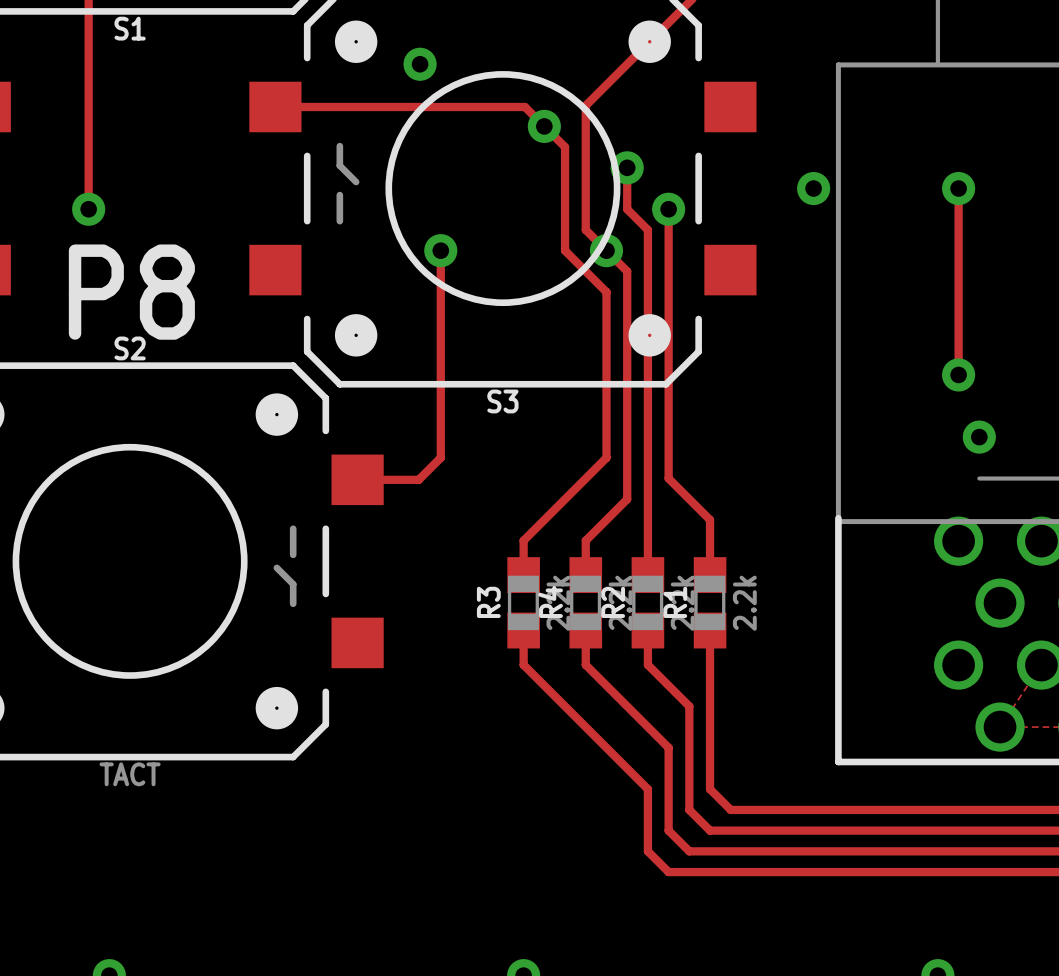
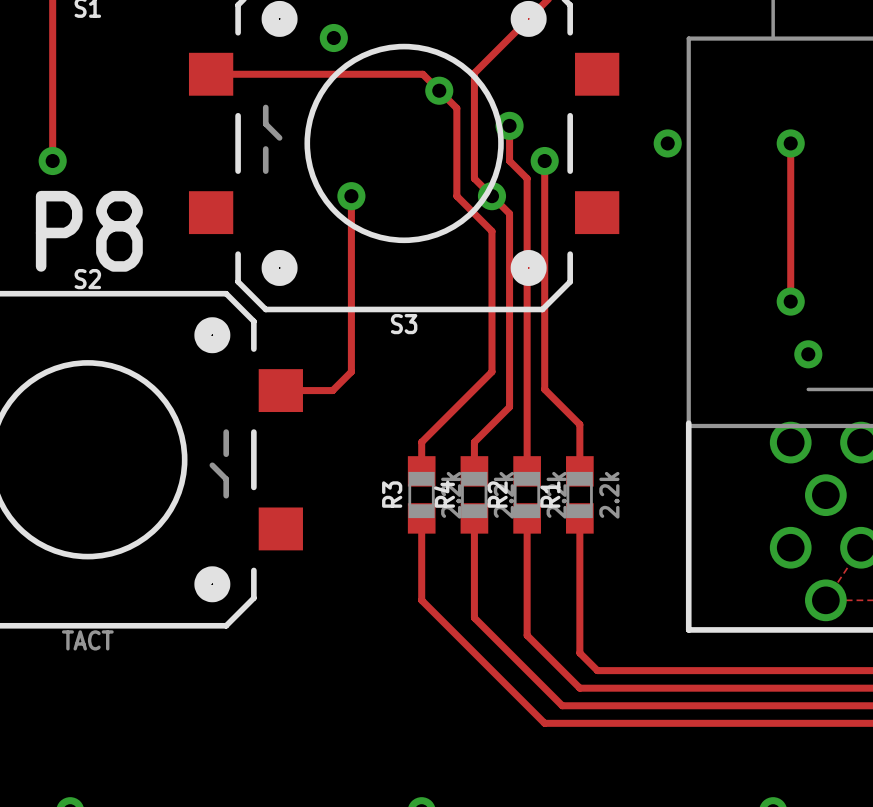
track: (523, 664) (647, 789) (647, 851) -> (421, 547) (421, 600) (527, 705)
track: (585, 664) (668, 747) (668, 830) -> (474, 547) (474, 617) (544, 688)
track: (647, 664) (689, 706) (689, 809) -> (527, 547) (527, 635) (562, 670)

